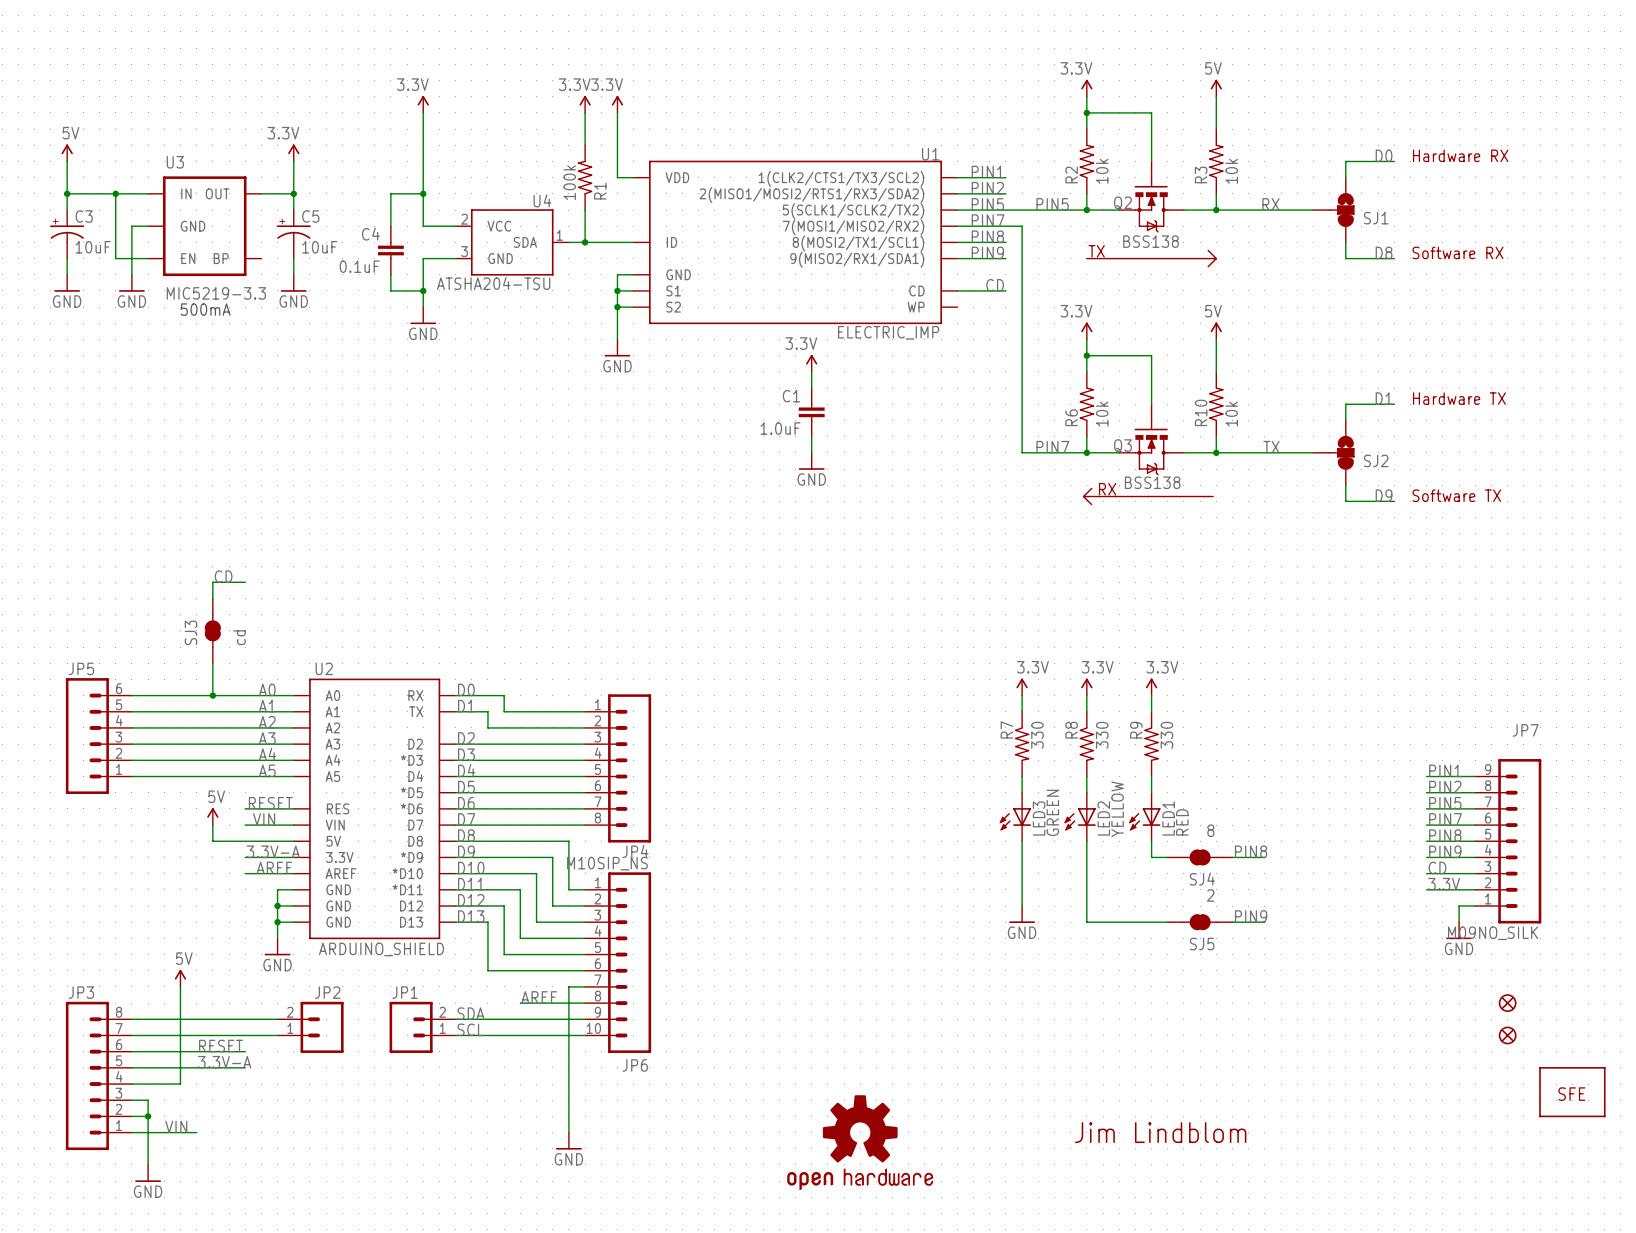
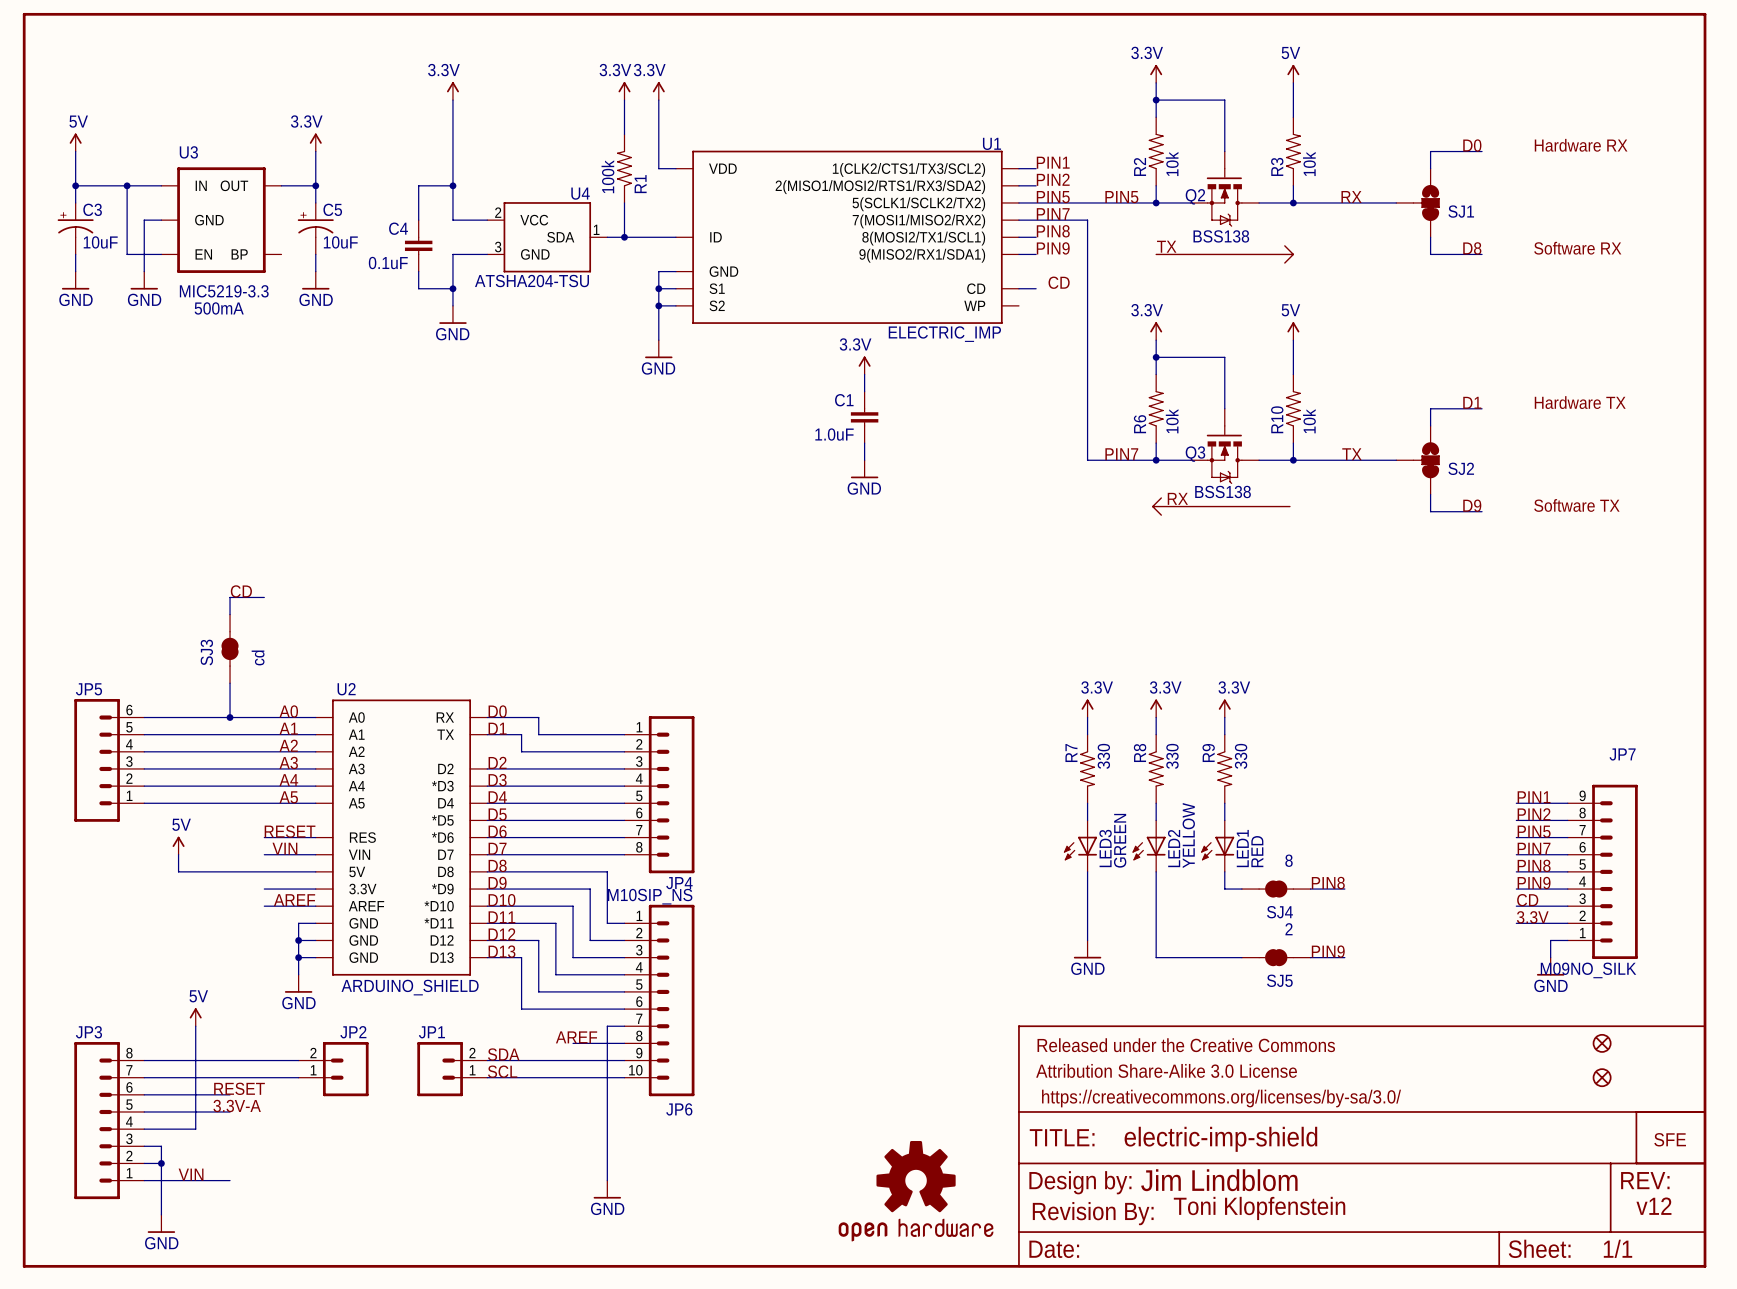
text position: Hardware RX (1460, 155) -> Hardware RX (1581, 145)
wire: (973, 177) (1005, 177) -> none
wire: (973, 193) (1005, 193) -> none
wire: (973, 242) (1005, 242) -> none
text position: Software RX (1457, 252) -> Software RX (1577, 248)
wire: (973, 258) (1005, 258) -> none
wire: (973, 290) (1005, 290) -> none
text position: Hardware TX (1459, 398) -> Hardware TX (1580, 402)
text position: Software TX (1456, 495) -> Software TX (1576, 505)
part: none -> (864, 640)
power symbol position: 5V (212, 816) -> 5V (178, 845)
wire: (212, 825) (212, 841) -> (178, 854) (178, 871) (230, 871)
label: 3.3V-A (273, 851) -> none
wire: (520, 1003) (536, 1003) -> none
wire: (212, 1051) (245, 1051) -> none
wire: (212, 1067) (245, 1067) -> none
part: none -> (1361, 1146)
wire: none -> (212, 1180) (230, 1180)
text: none -> v12 (1653, 1206)
text: none -> Toni Klopfenstein (1259, 1208)
part: none -> (1093, 1213)

